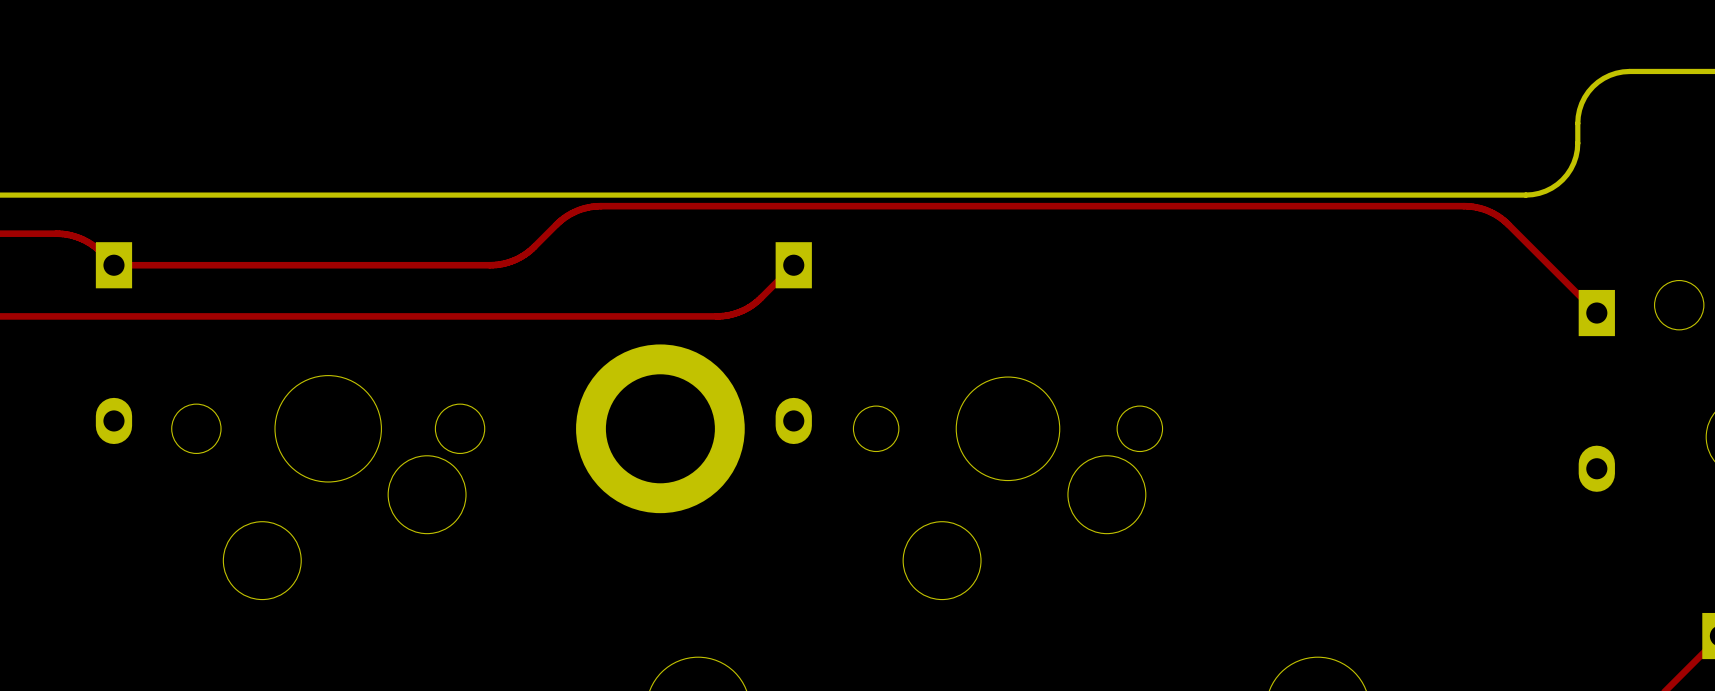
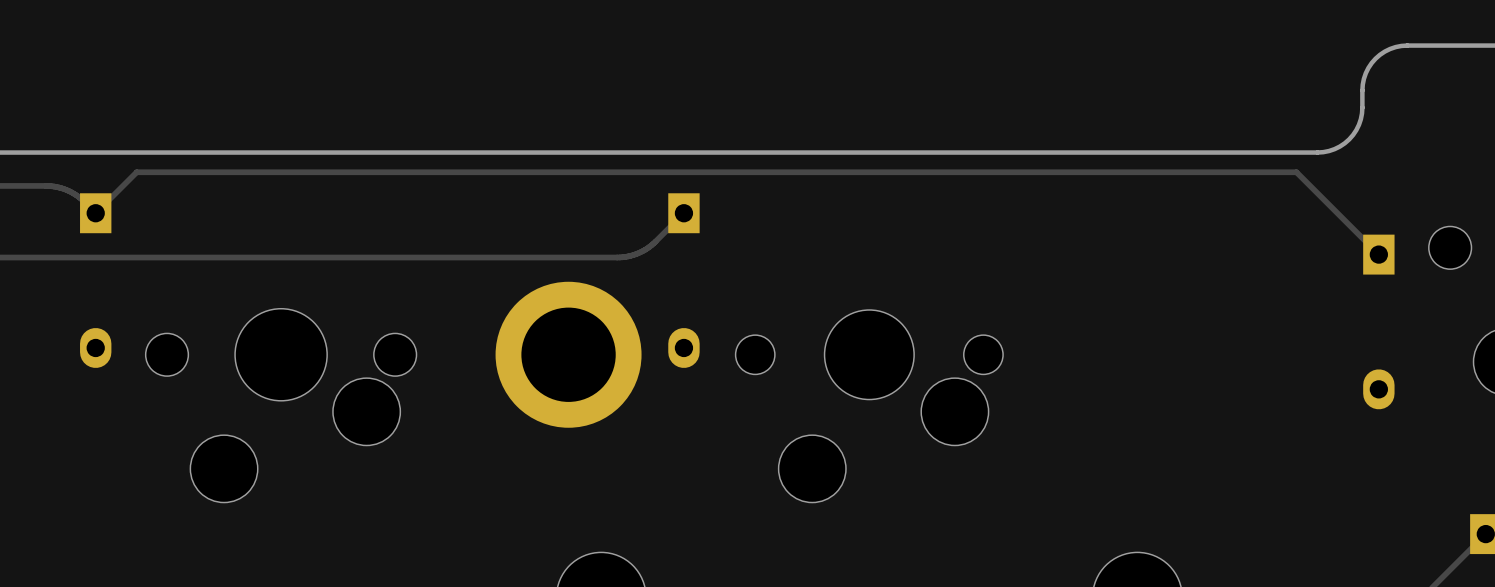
track: (1508, 224) (1487, 210) (1464, 206) (597, 206) (582, 208) (568, 215) (524, 254) (511, 261) (496, 264) (113, 265) -> (1302, 178) (1296, 172) (136, 172) (95, 213)

